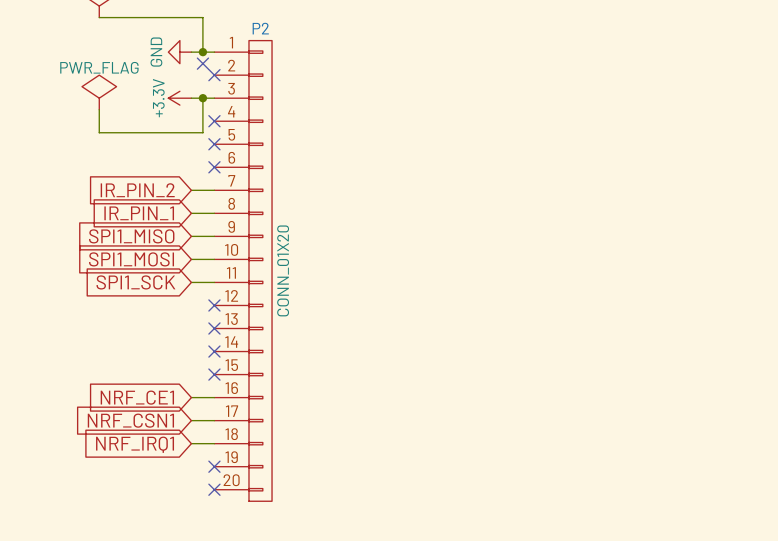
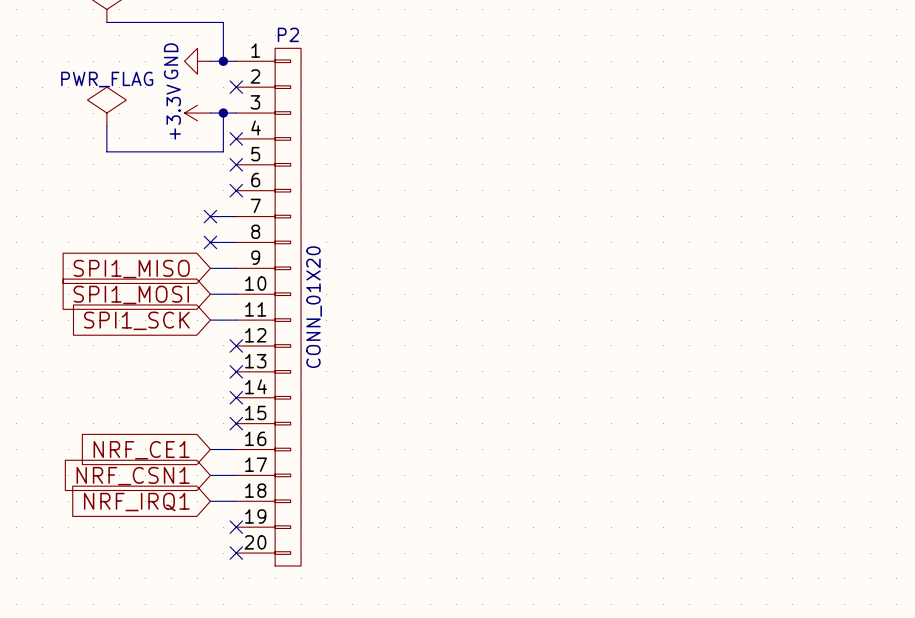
no-connect mark: (202, 63) -> none
global label: IR_PIN_2 (137, 190) -> none
no-connect mark: none -> (210, 216)
global label: IR_PIN_1 (139, 213) -> none
no-connect mark: none -> (210, 242)

